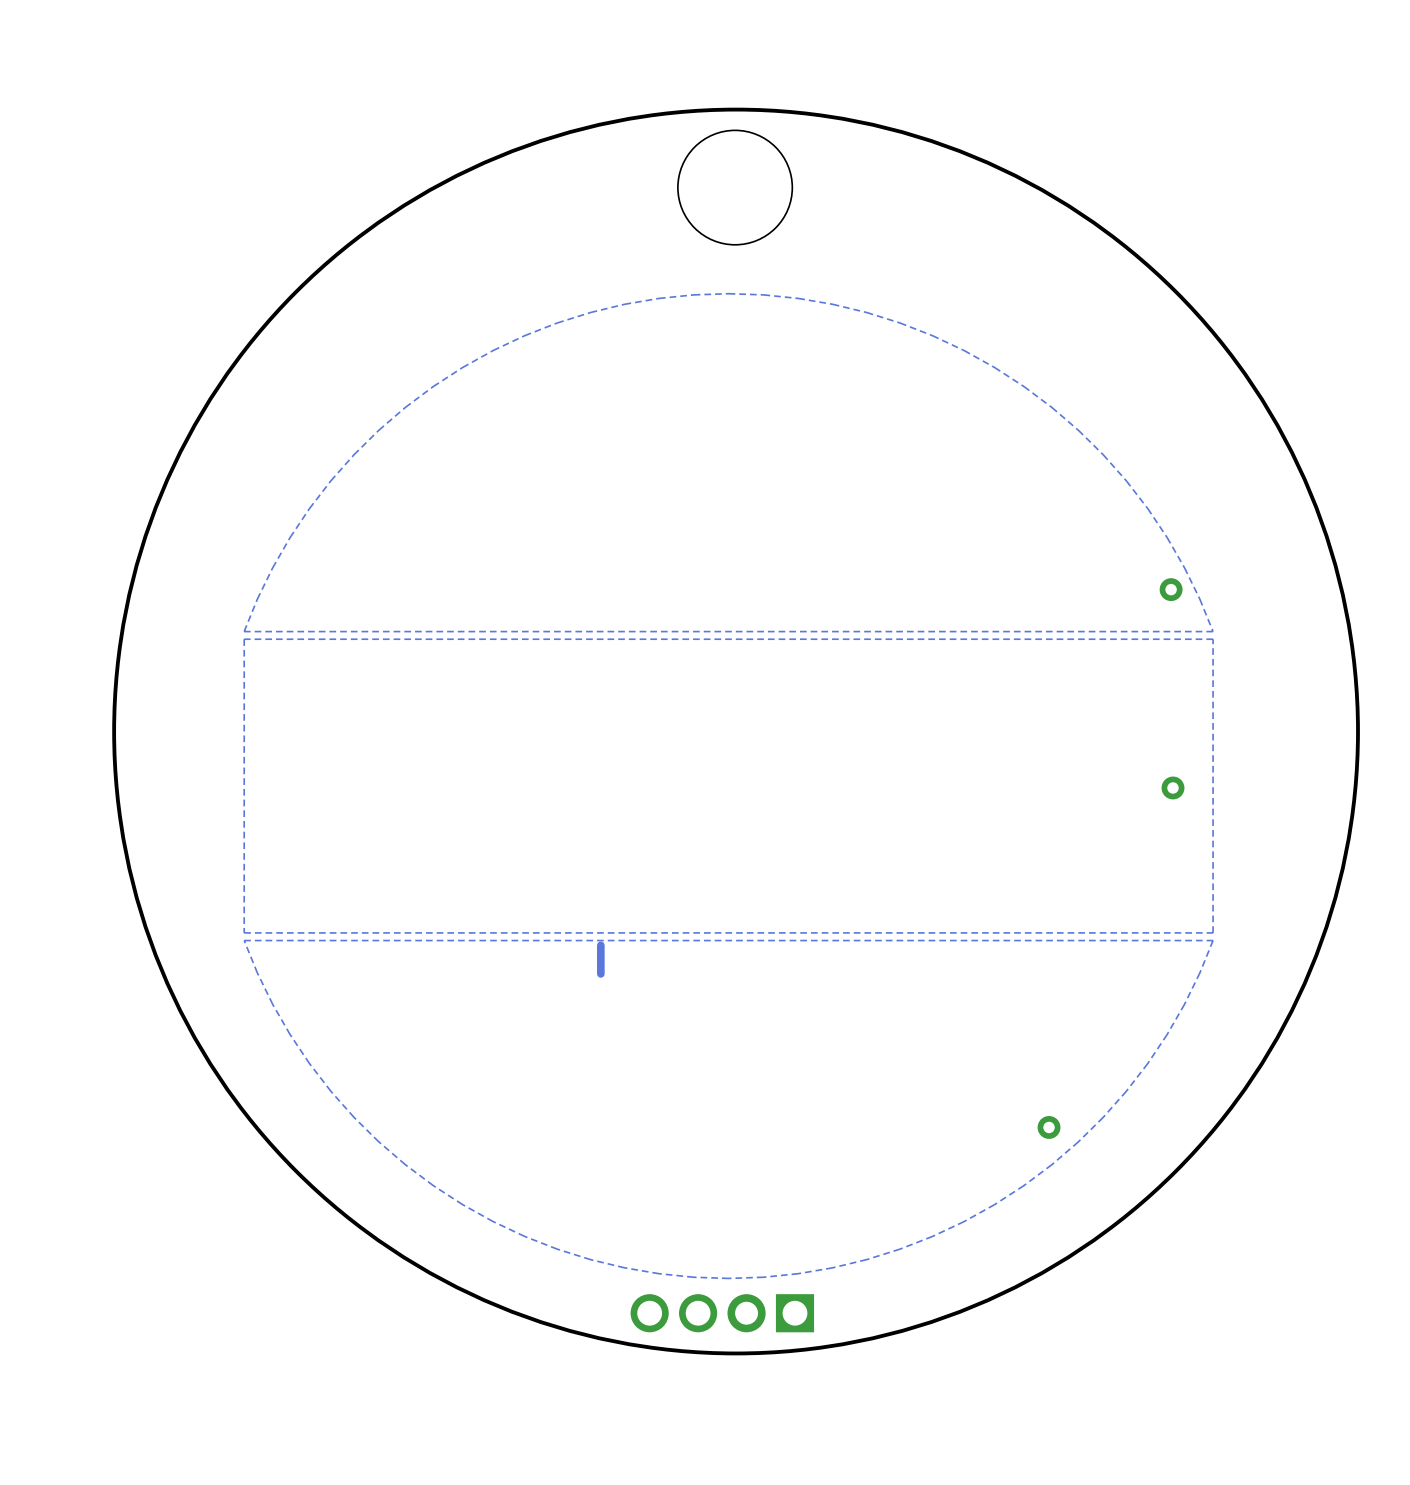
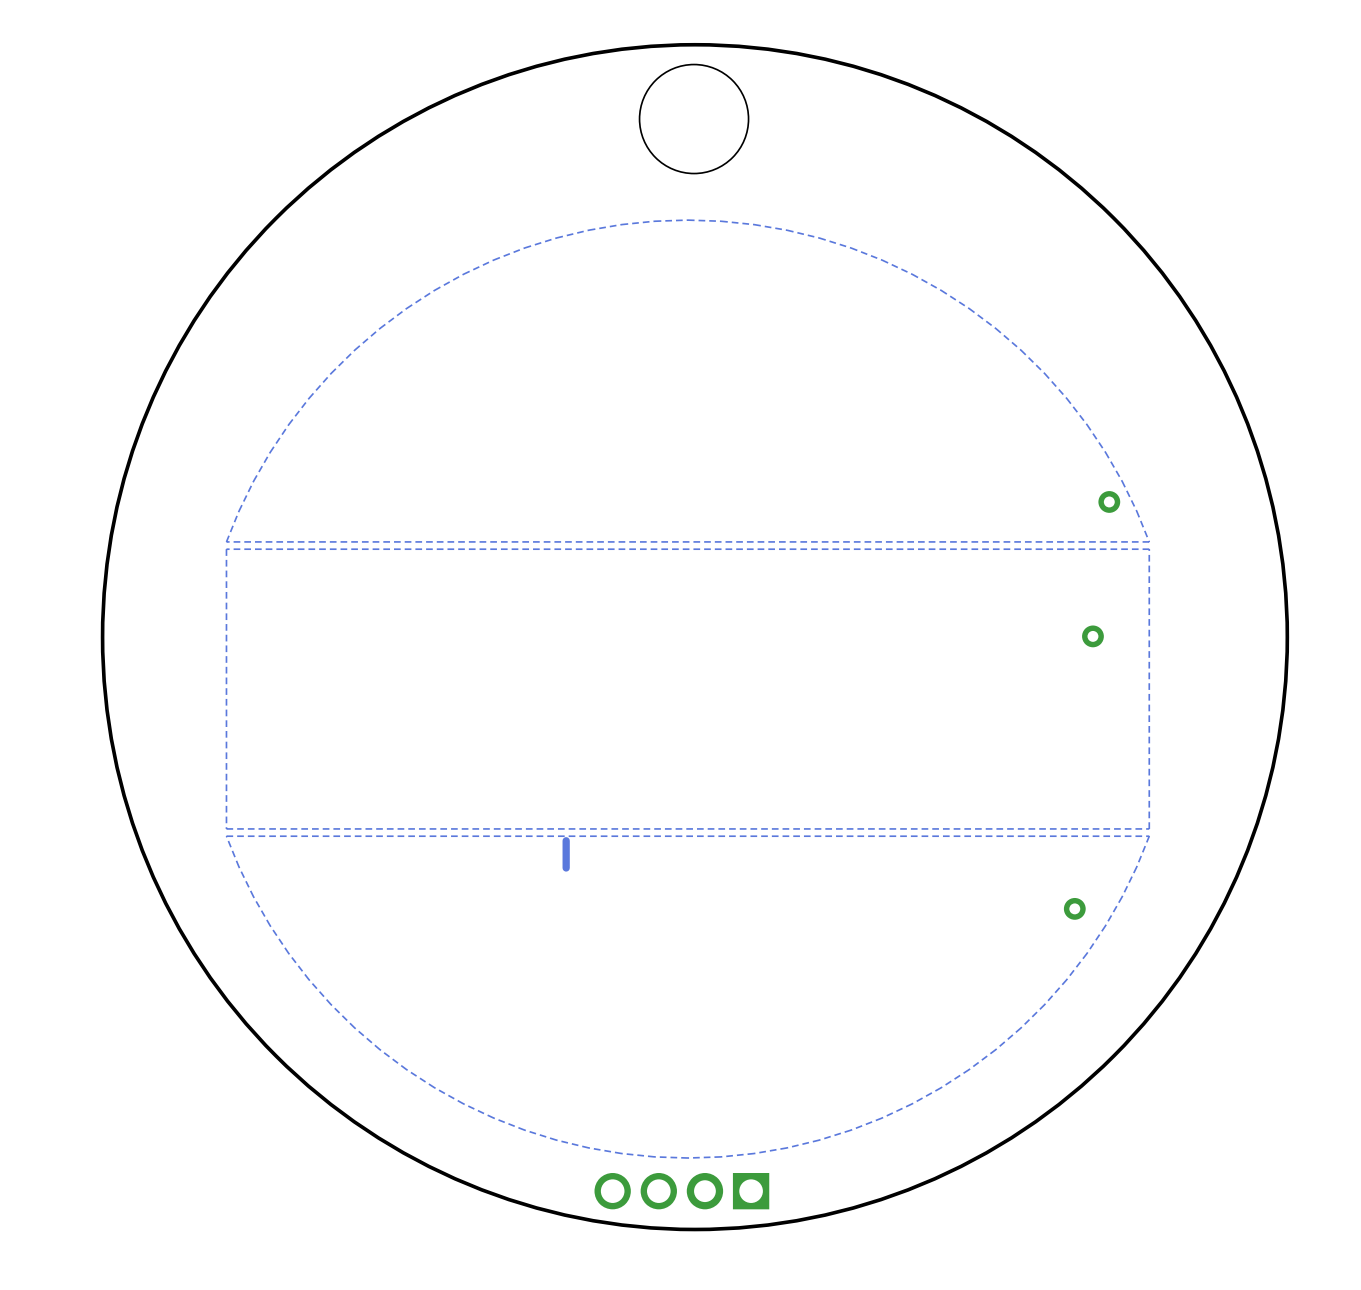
via position: (1173, 787) -> (1092, 636)
via: none -> (1074, 908)
via: (1049, 1127) -> none

